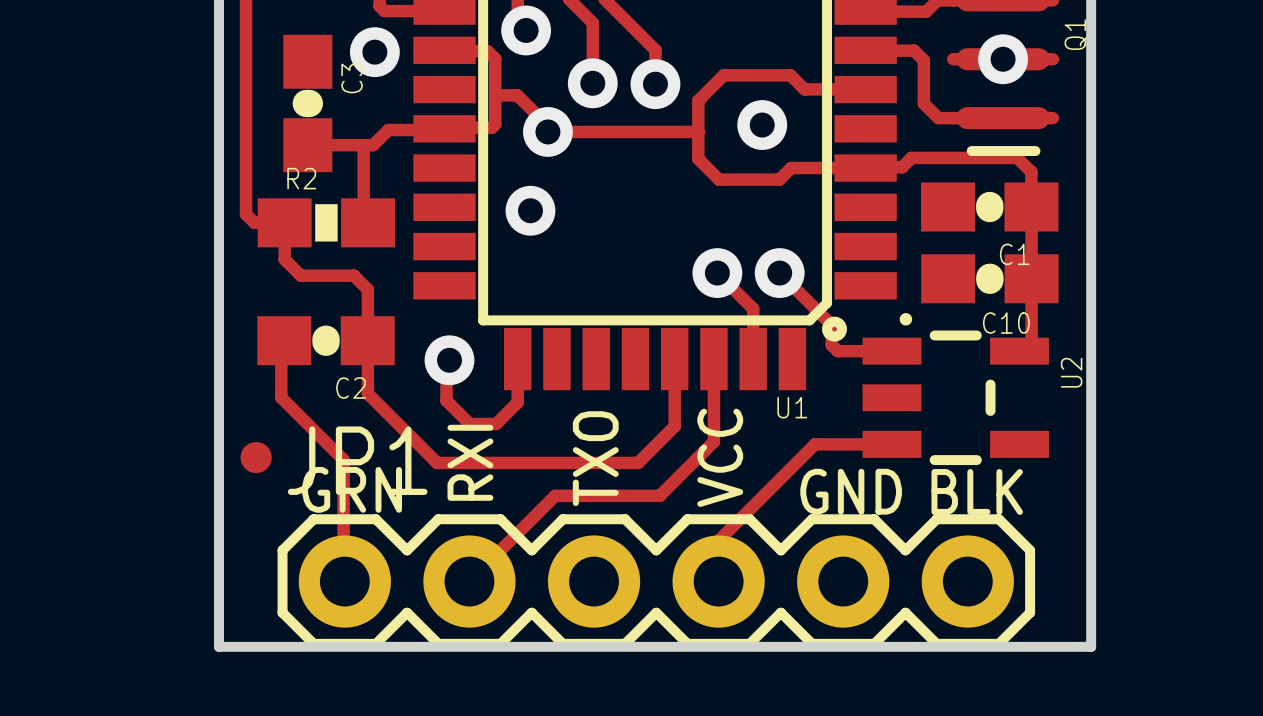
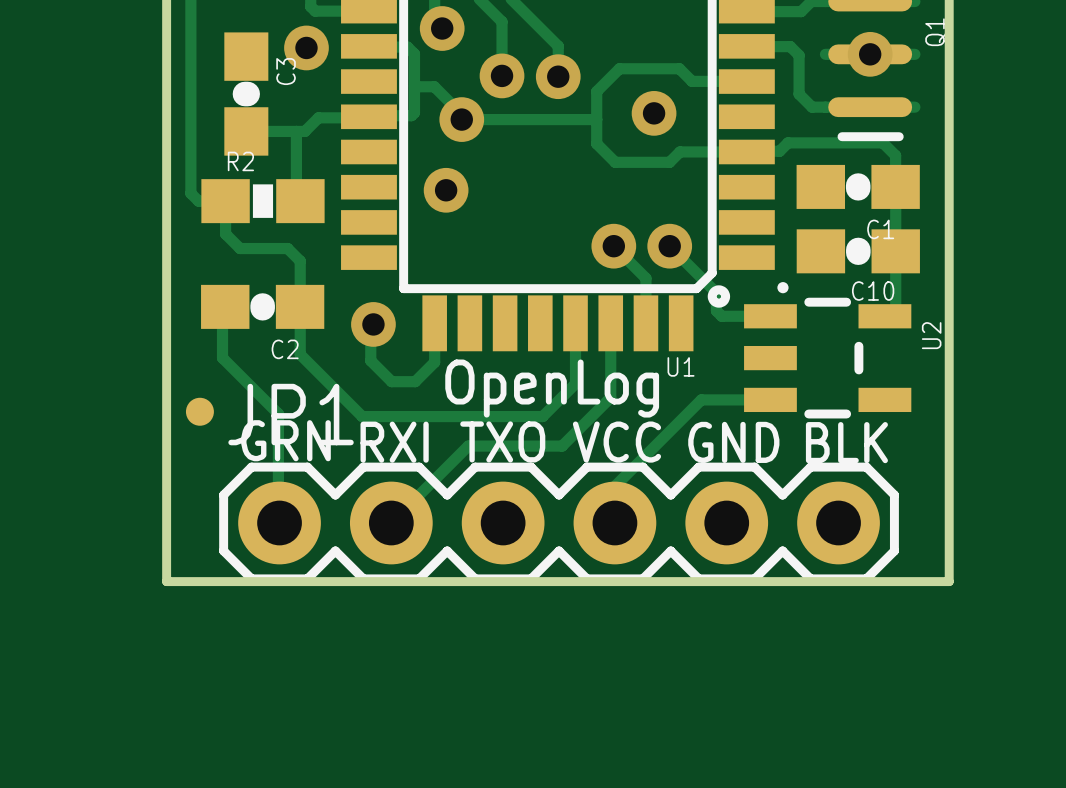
text: none -> OpenLog (552, 388)
text rotation: 0° (720, 457) -> 90° clockwise (616, 442)
text rotation: 0° (595, 458) -> 90° clockwise (502, 441)
text rotation: 0° (470, 462) -> 90° clockwise (394, 442)

